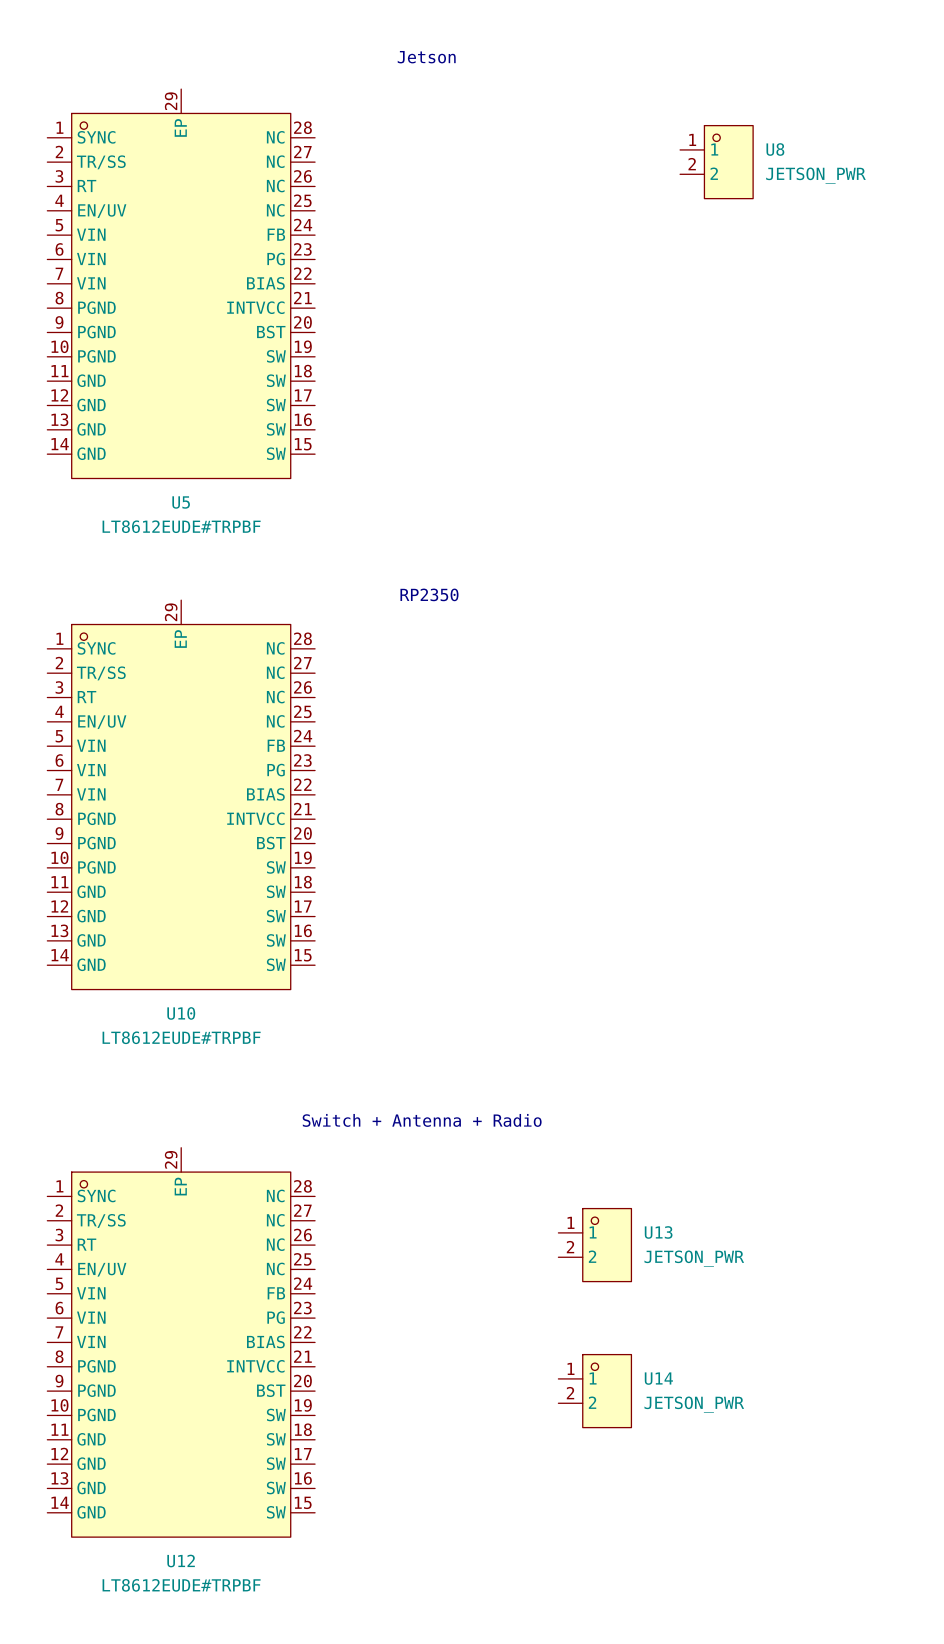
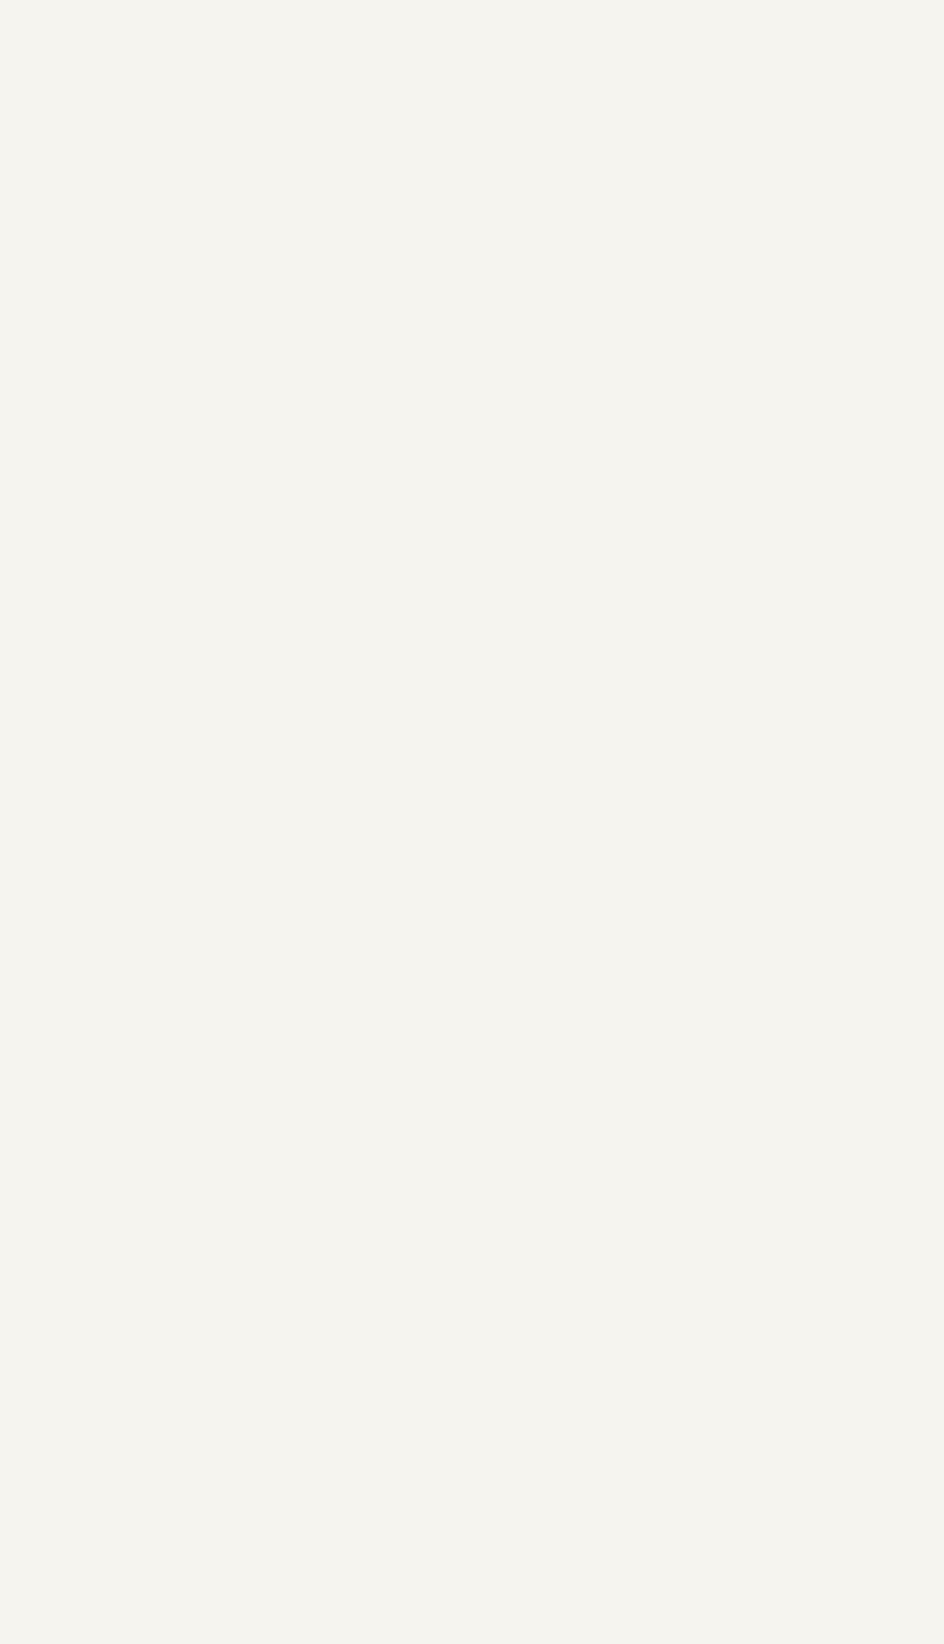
text: Jetson (426, 57) -> none
U8: JETSON_PWR (716, 162) -> none
U5: LT8612EUDE#TRPBF (181, 283) -> none
text: RP2350 (429, 594) -> none
U10: LT8612EUDE#TRPBF (181, 794) -> none
text: Switch + Antenna + Radio (422, 1120) -> none
U13: JETSON_PWR (594, 1245) -> none
U12: LT8612EUDE#TRPBF (181, 1342) -> none
U14: JETSON_PWR (594, 1391) -> none

